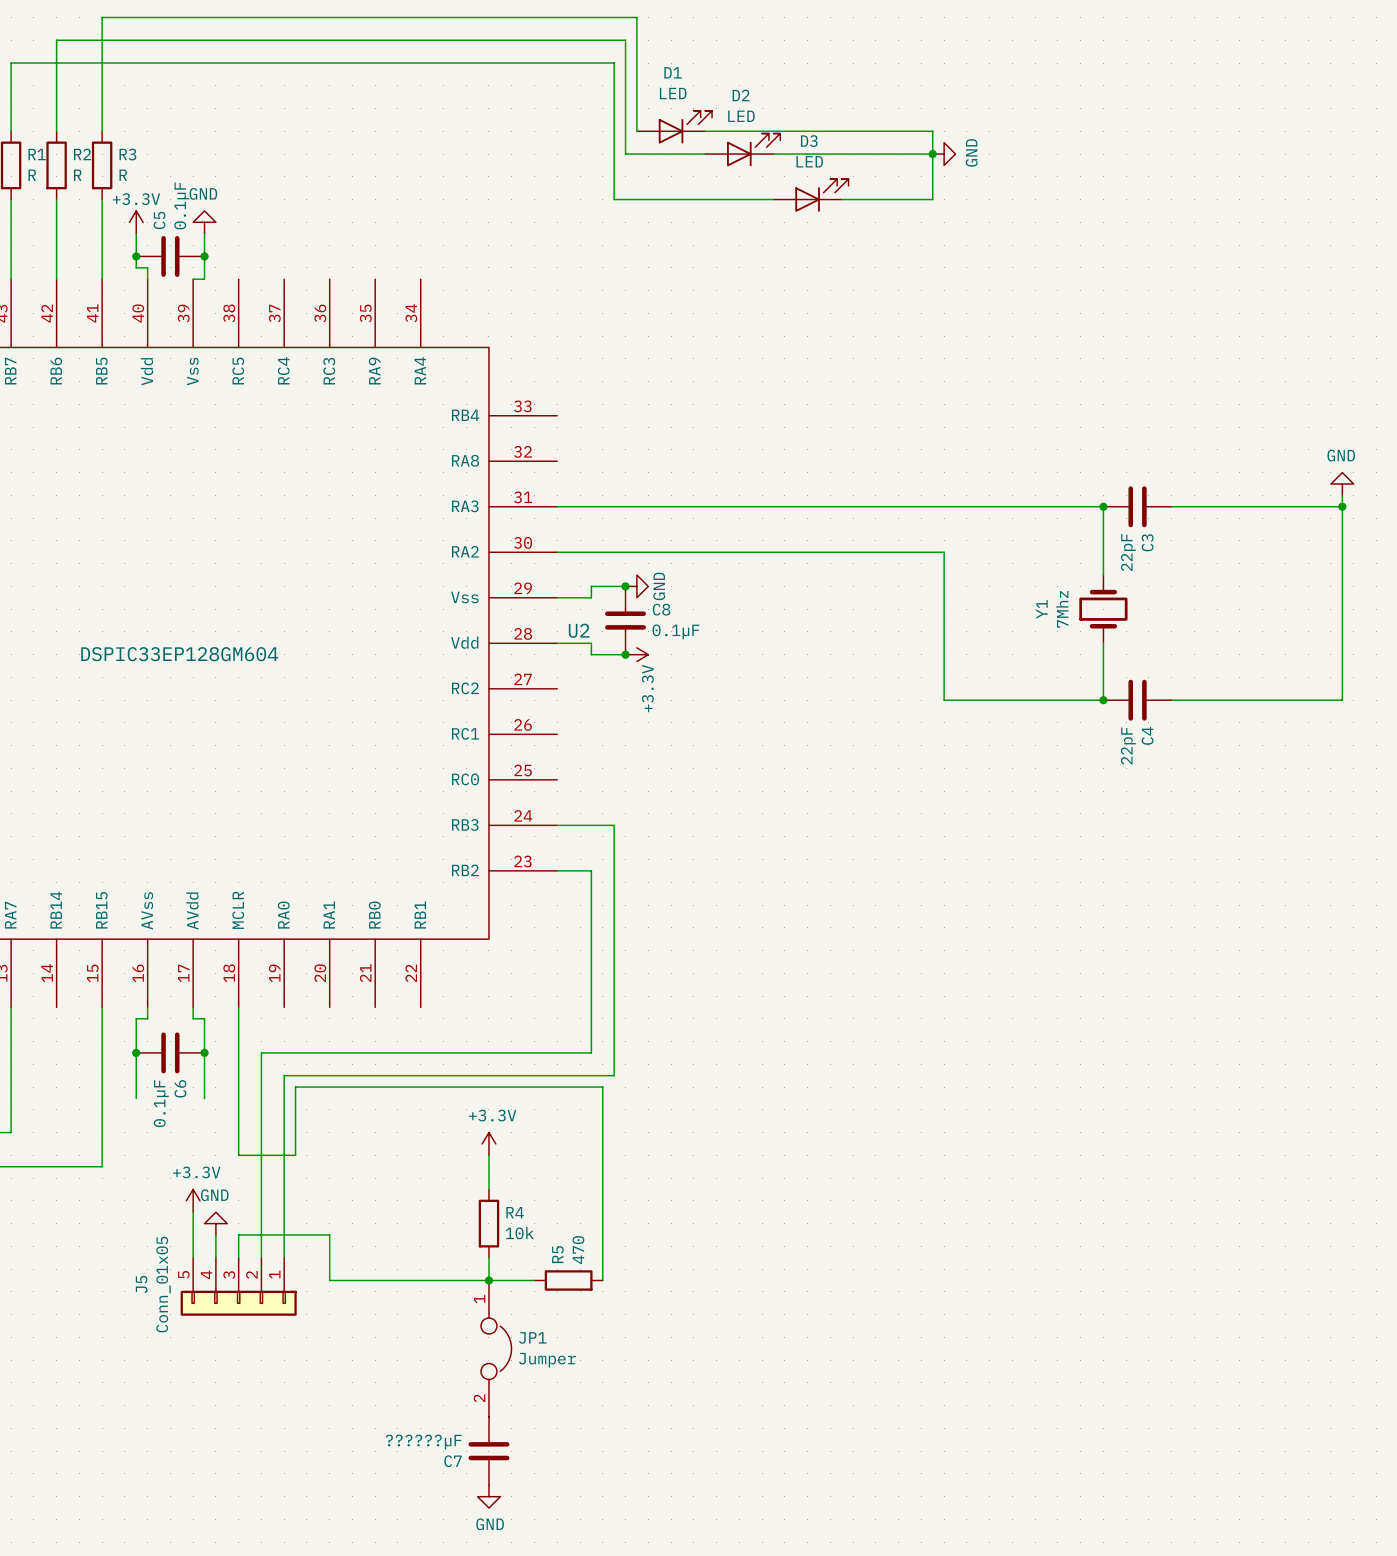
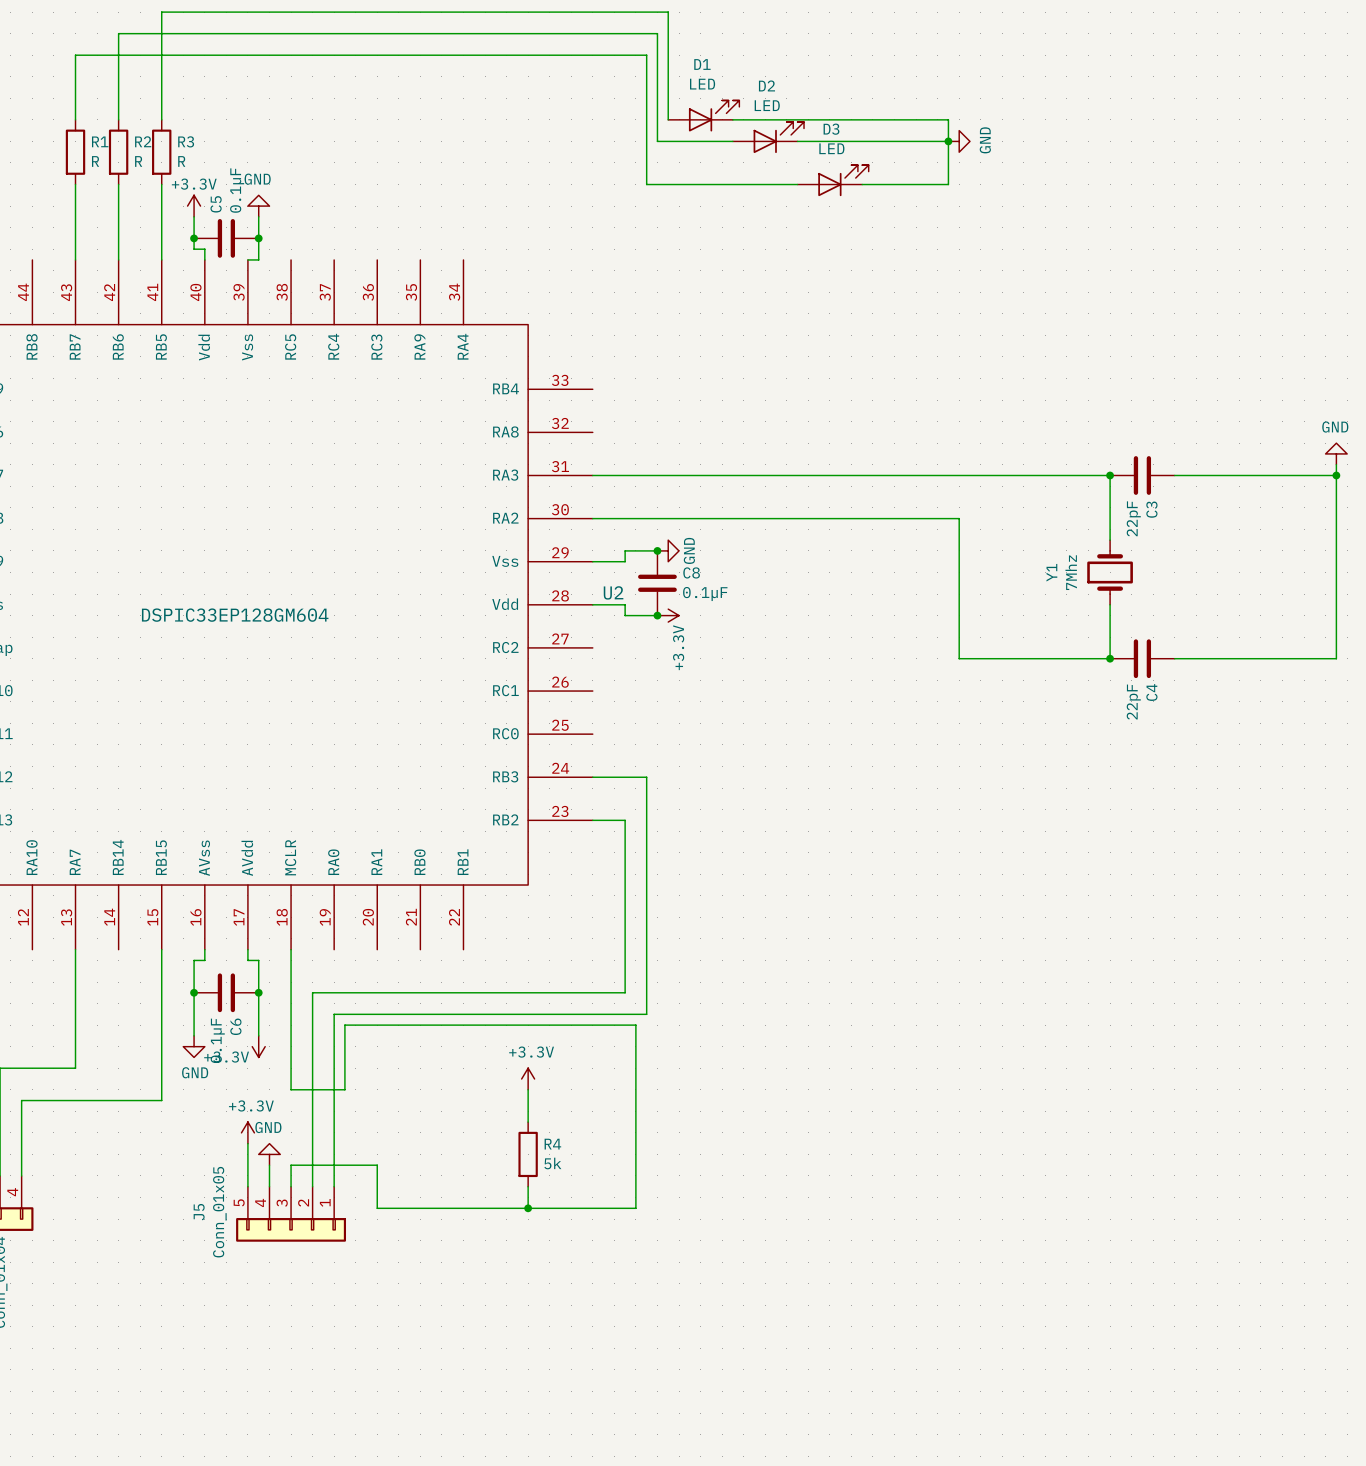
power symbol: none -> GND (194, 1046)
power symbol: none -> +3.3V (258, 1046)
R4 value: 10k (519, 1233) -> 5k (552, 1163)
wire: none -> (571, 1208) (635, 1208)
R5: 470 (568, 1280) -> none
JP1: Jumper (496, 1348) -> none
C7: ??????µF (488, 1451) -> none
power symbol: GND (488, 1496) -> none

